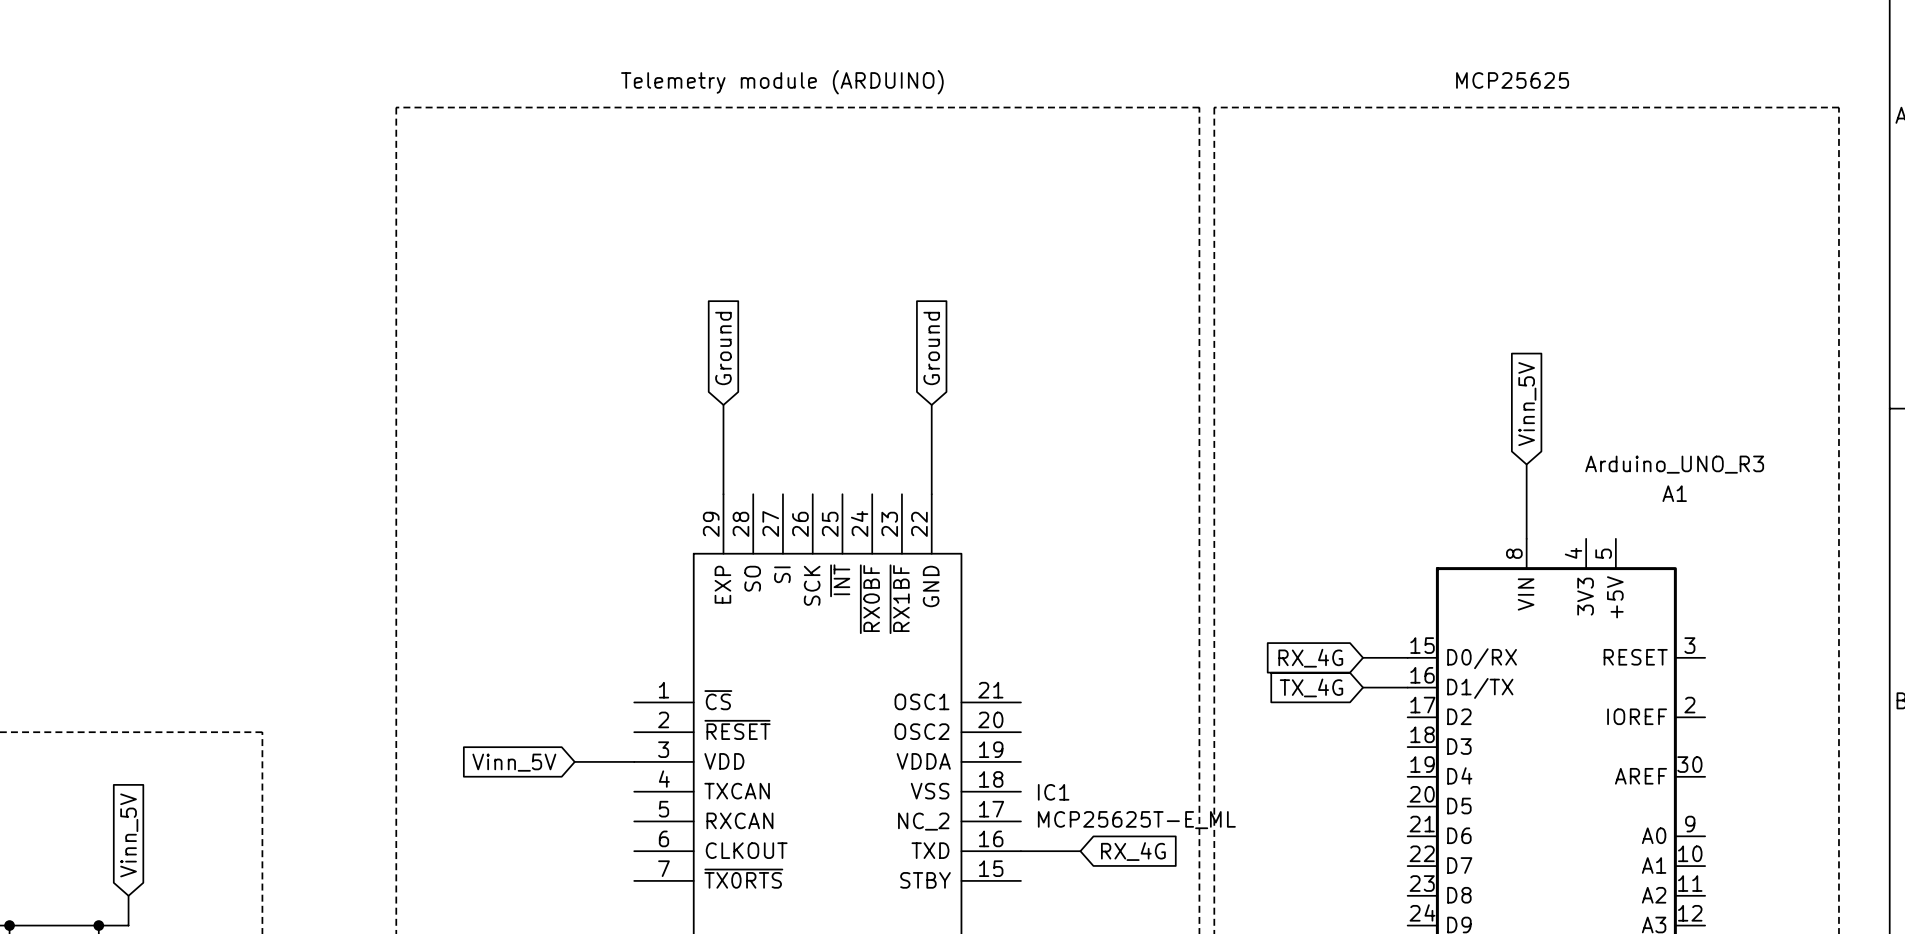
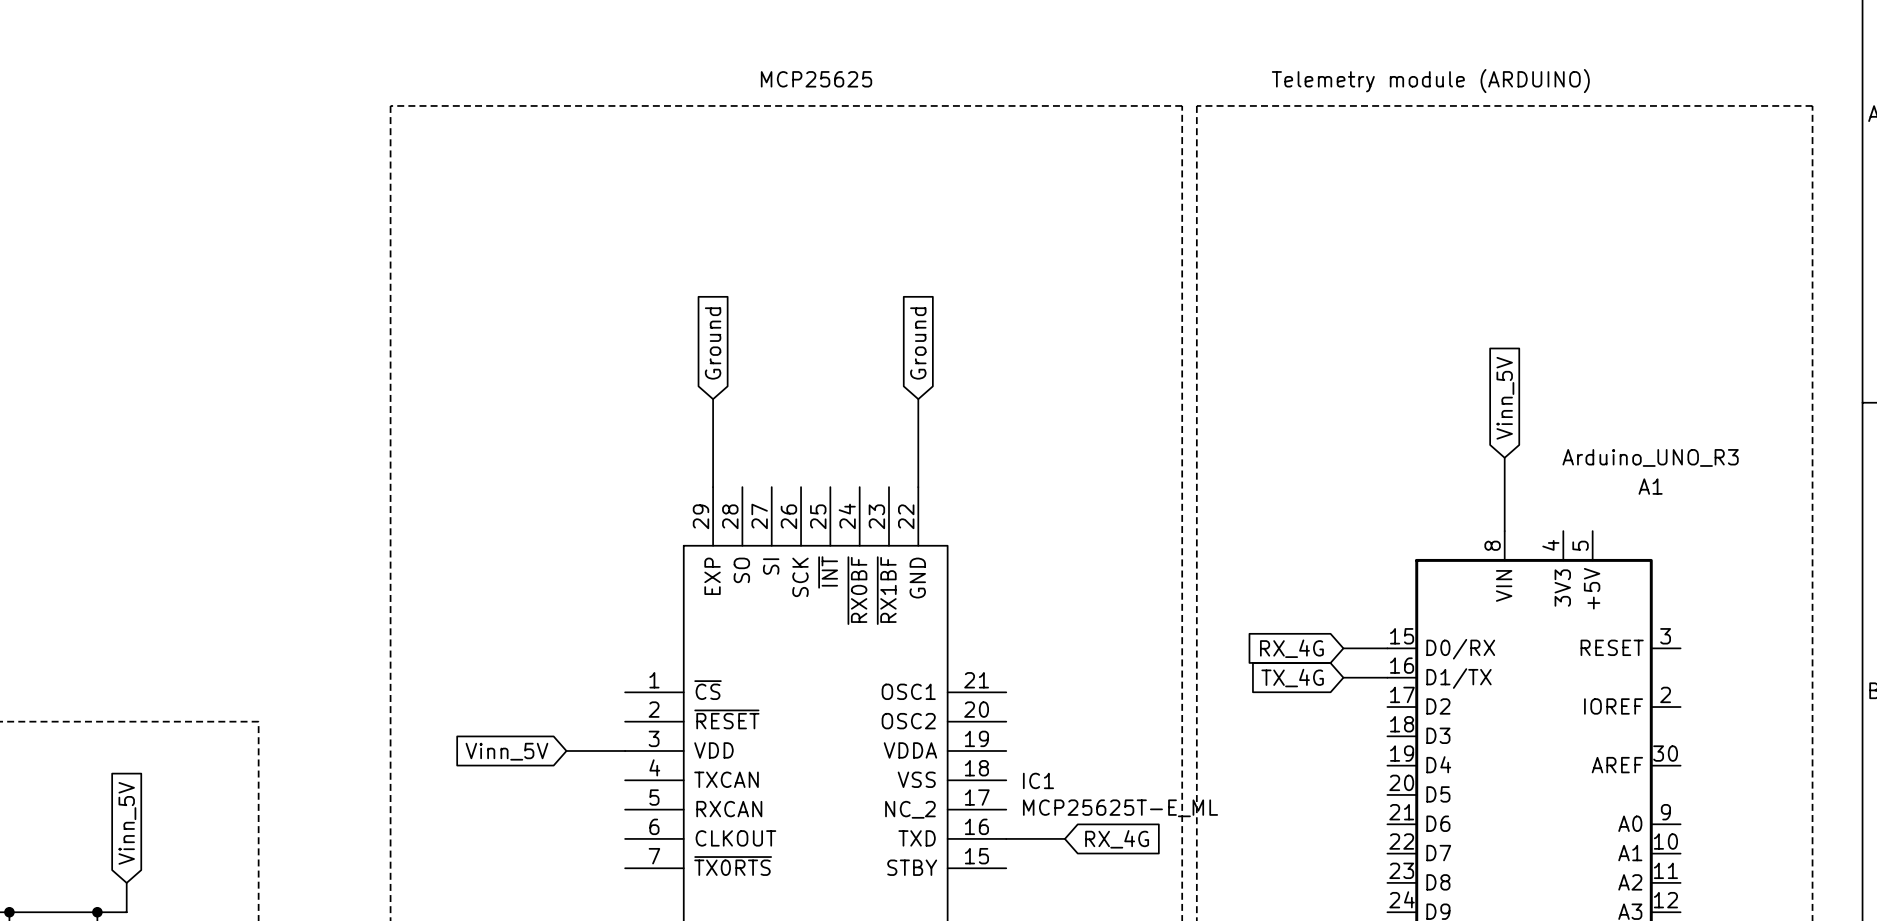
text: none -> MCP25625 (816, 79)
text: MCP25625 (1512, 80) -> none
text: Telemetry module (ARDUINO) (782, 82) -> none
text: none -> Telemetry module (ARDUINO) (1430, 81)

